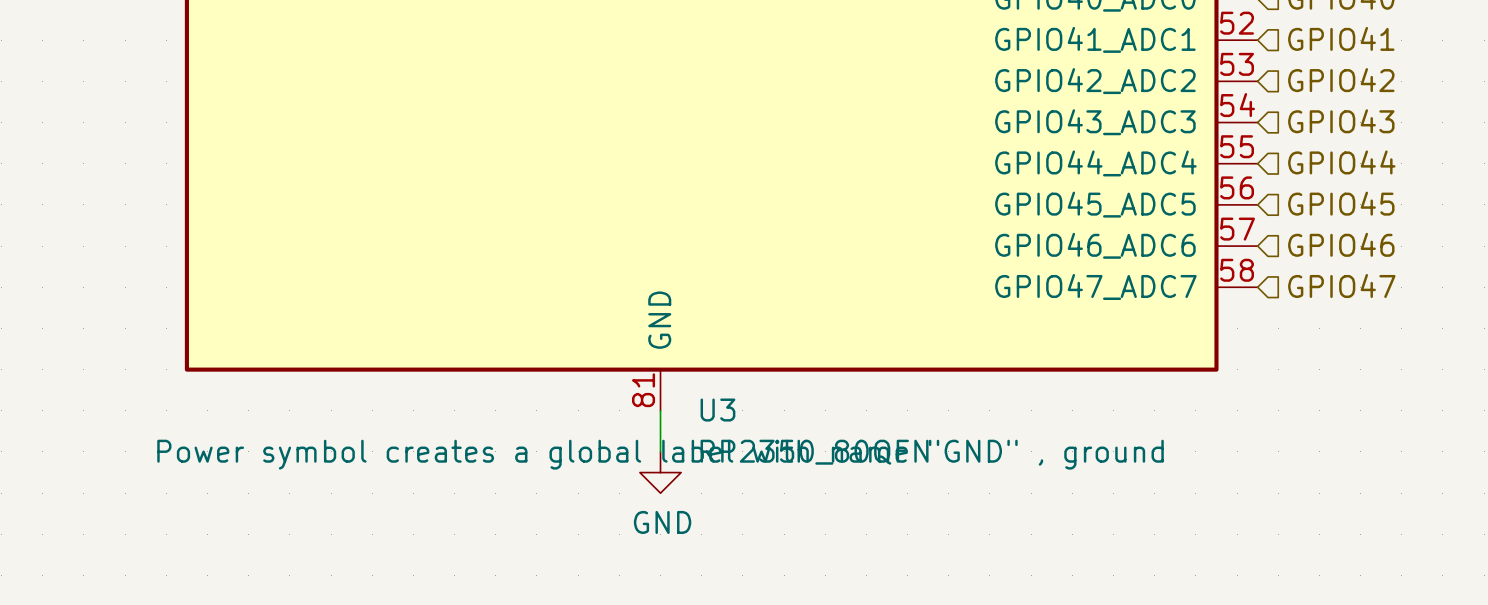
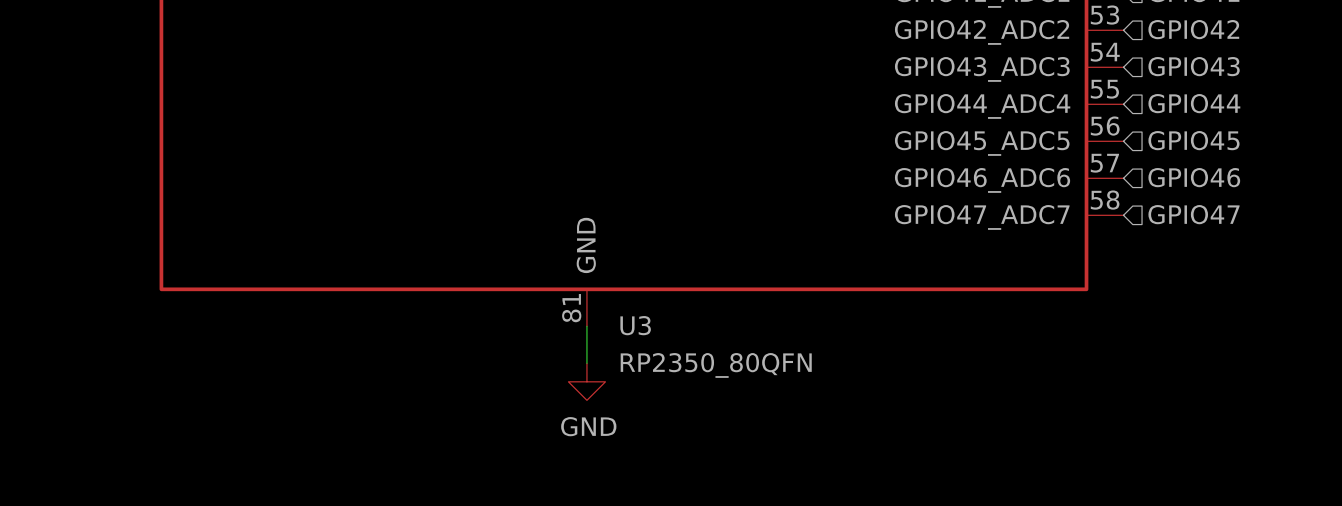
power symbol text: Power symbol creates a global label with name "GND" , ground (660, 454) -> none

